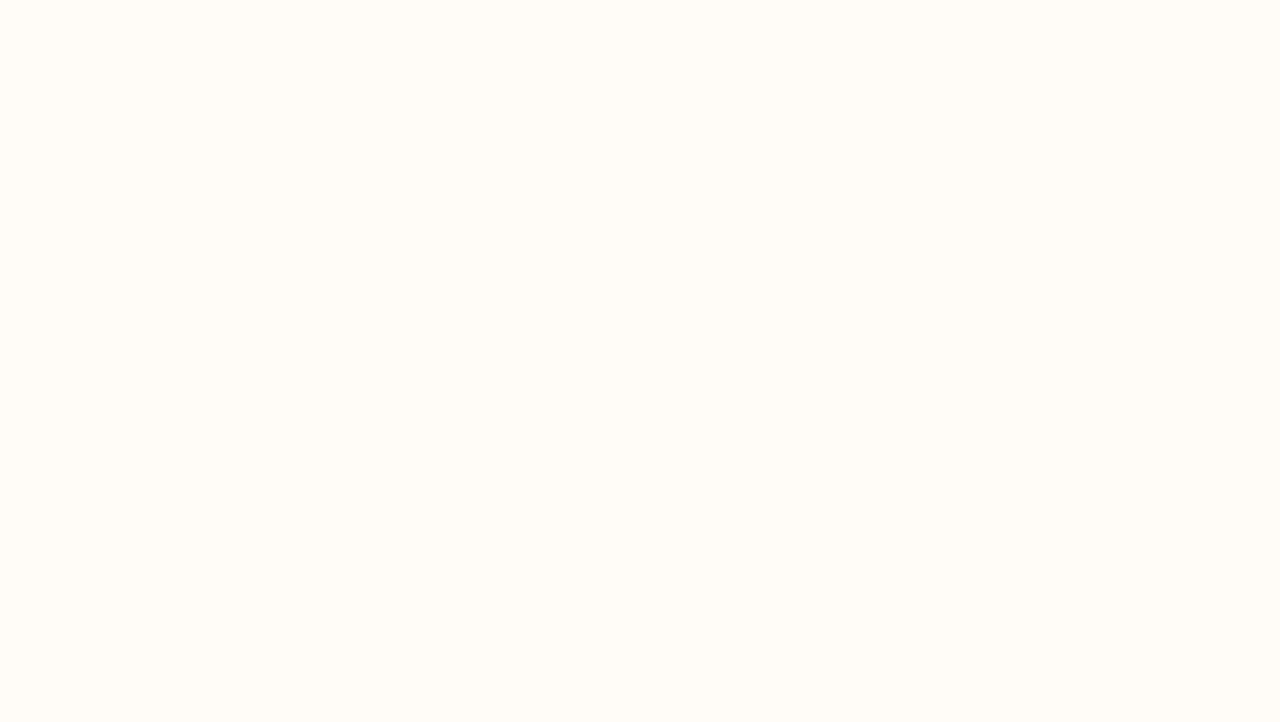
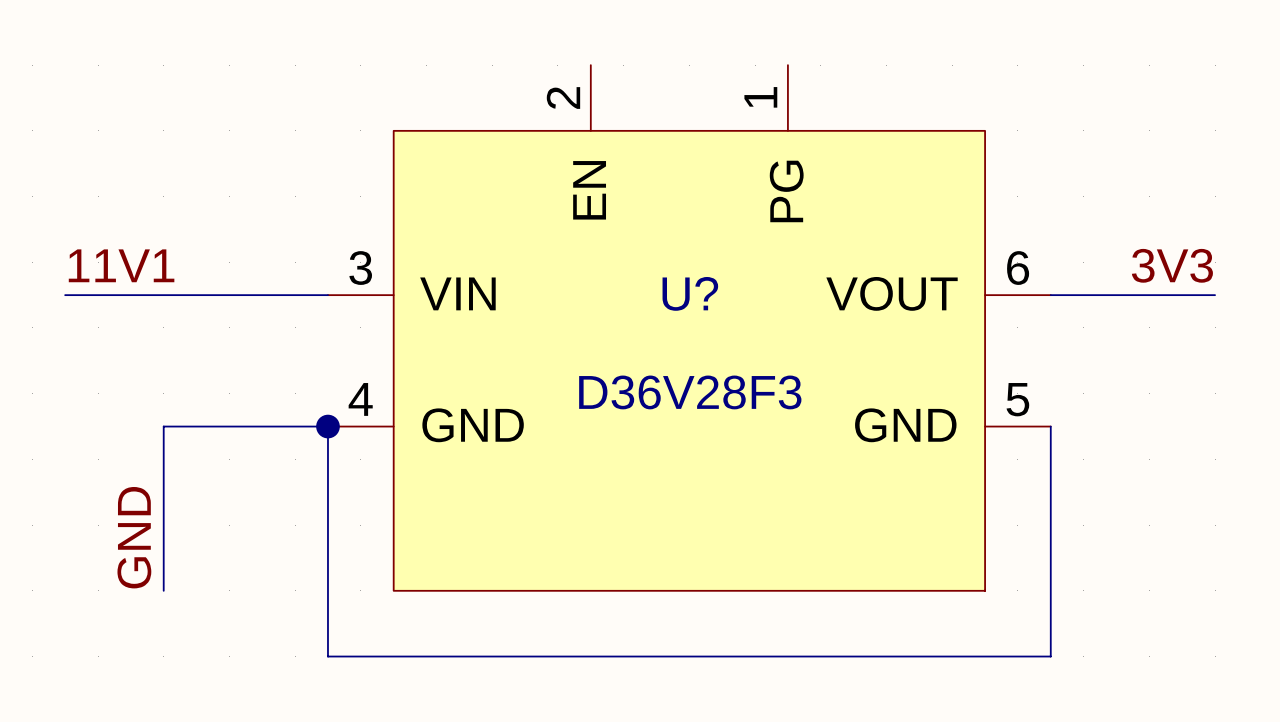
label: none -> 11V1 (121, 265)
label: none -> 3V3 (1172, 265)
wire: none -> (65, 295) (327, 295)
wire: none -> (1050, 295) (1215, 295)
U?: none -> D36V28F3 (689, 327)
junction: none -> (327, 426)
wire: none -> (1050, 426) (1050, 656) (327, 656) (327, 426) (163, 426) (163, 590)
label: none -> GND (134, 537)

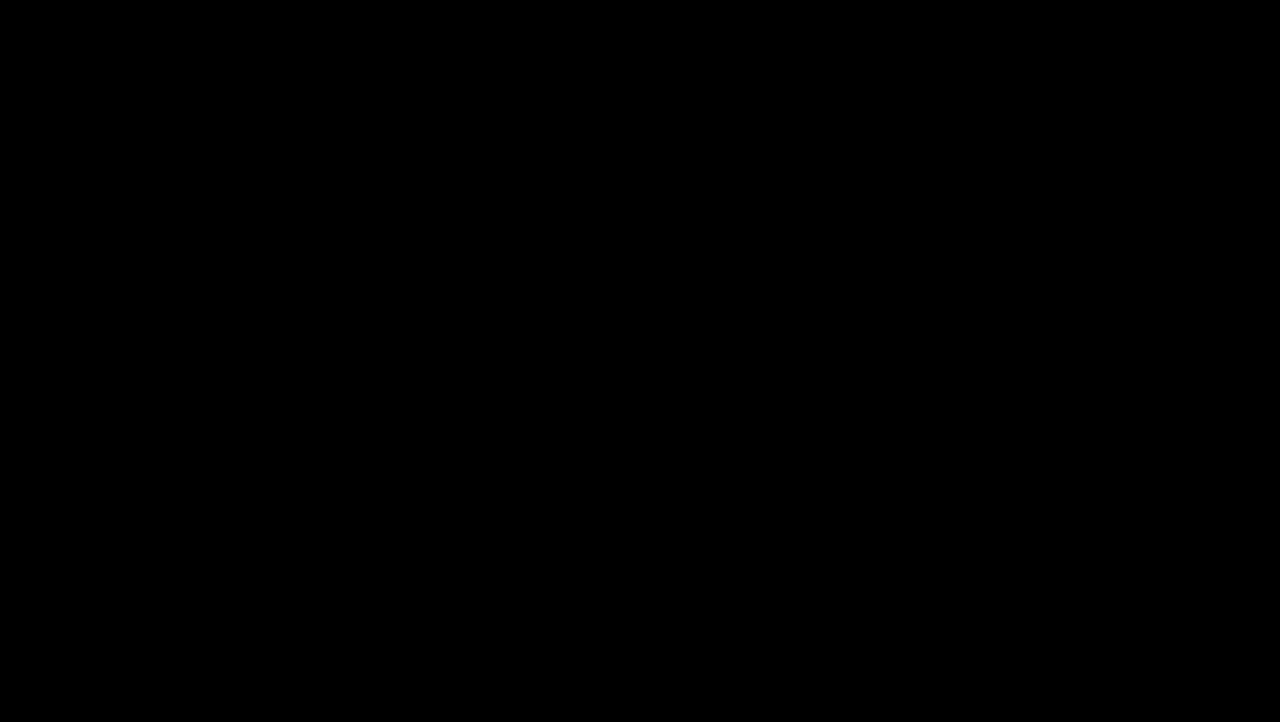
label: 11V1 (121, 265) -> none
label: 3V3 (1172, 265) -> none
wire: (65, 295) (327, 295) -> none
wire: (1050, 295) (1215, 295) -> none
U?: D36V28F3 (689, 327) -> none
junction: (327, 426) -> none
wire: (1050, 426) (1050, 656) (327, 656) (327, 426) (163, 426) (163, 590) -> none
label: GND (134, 537) -> none

